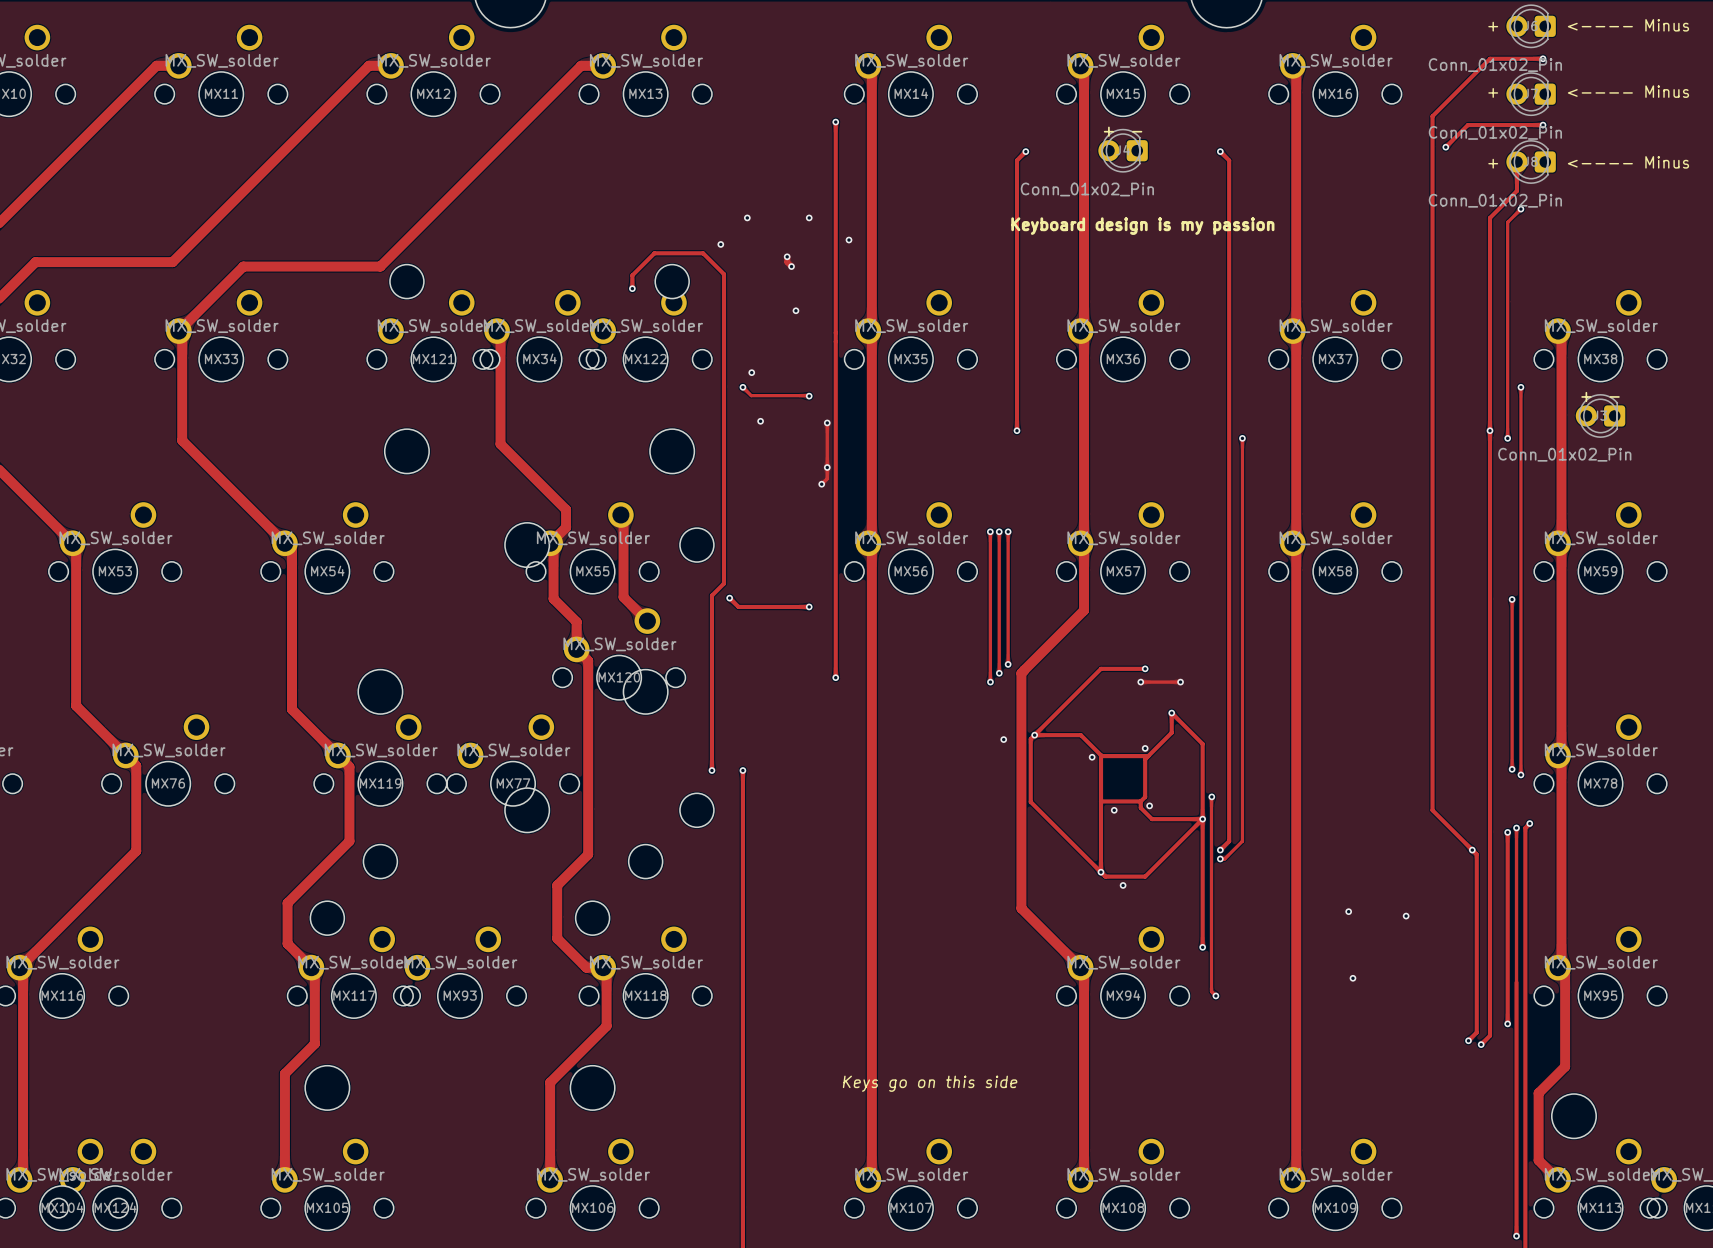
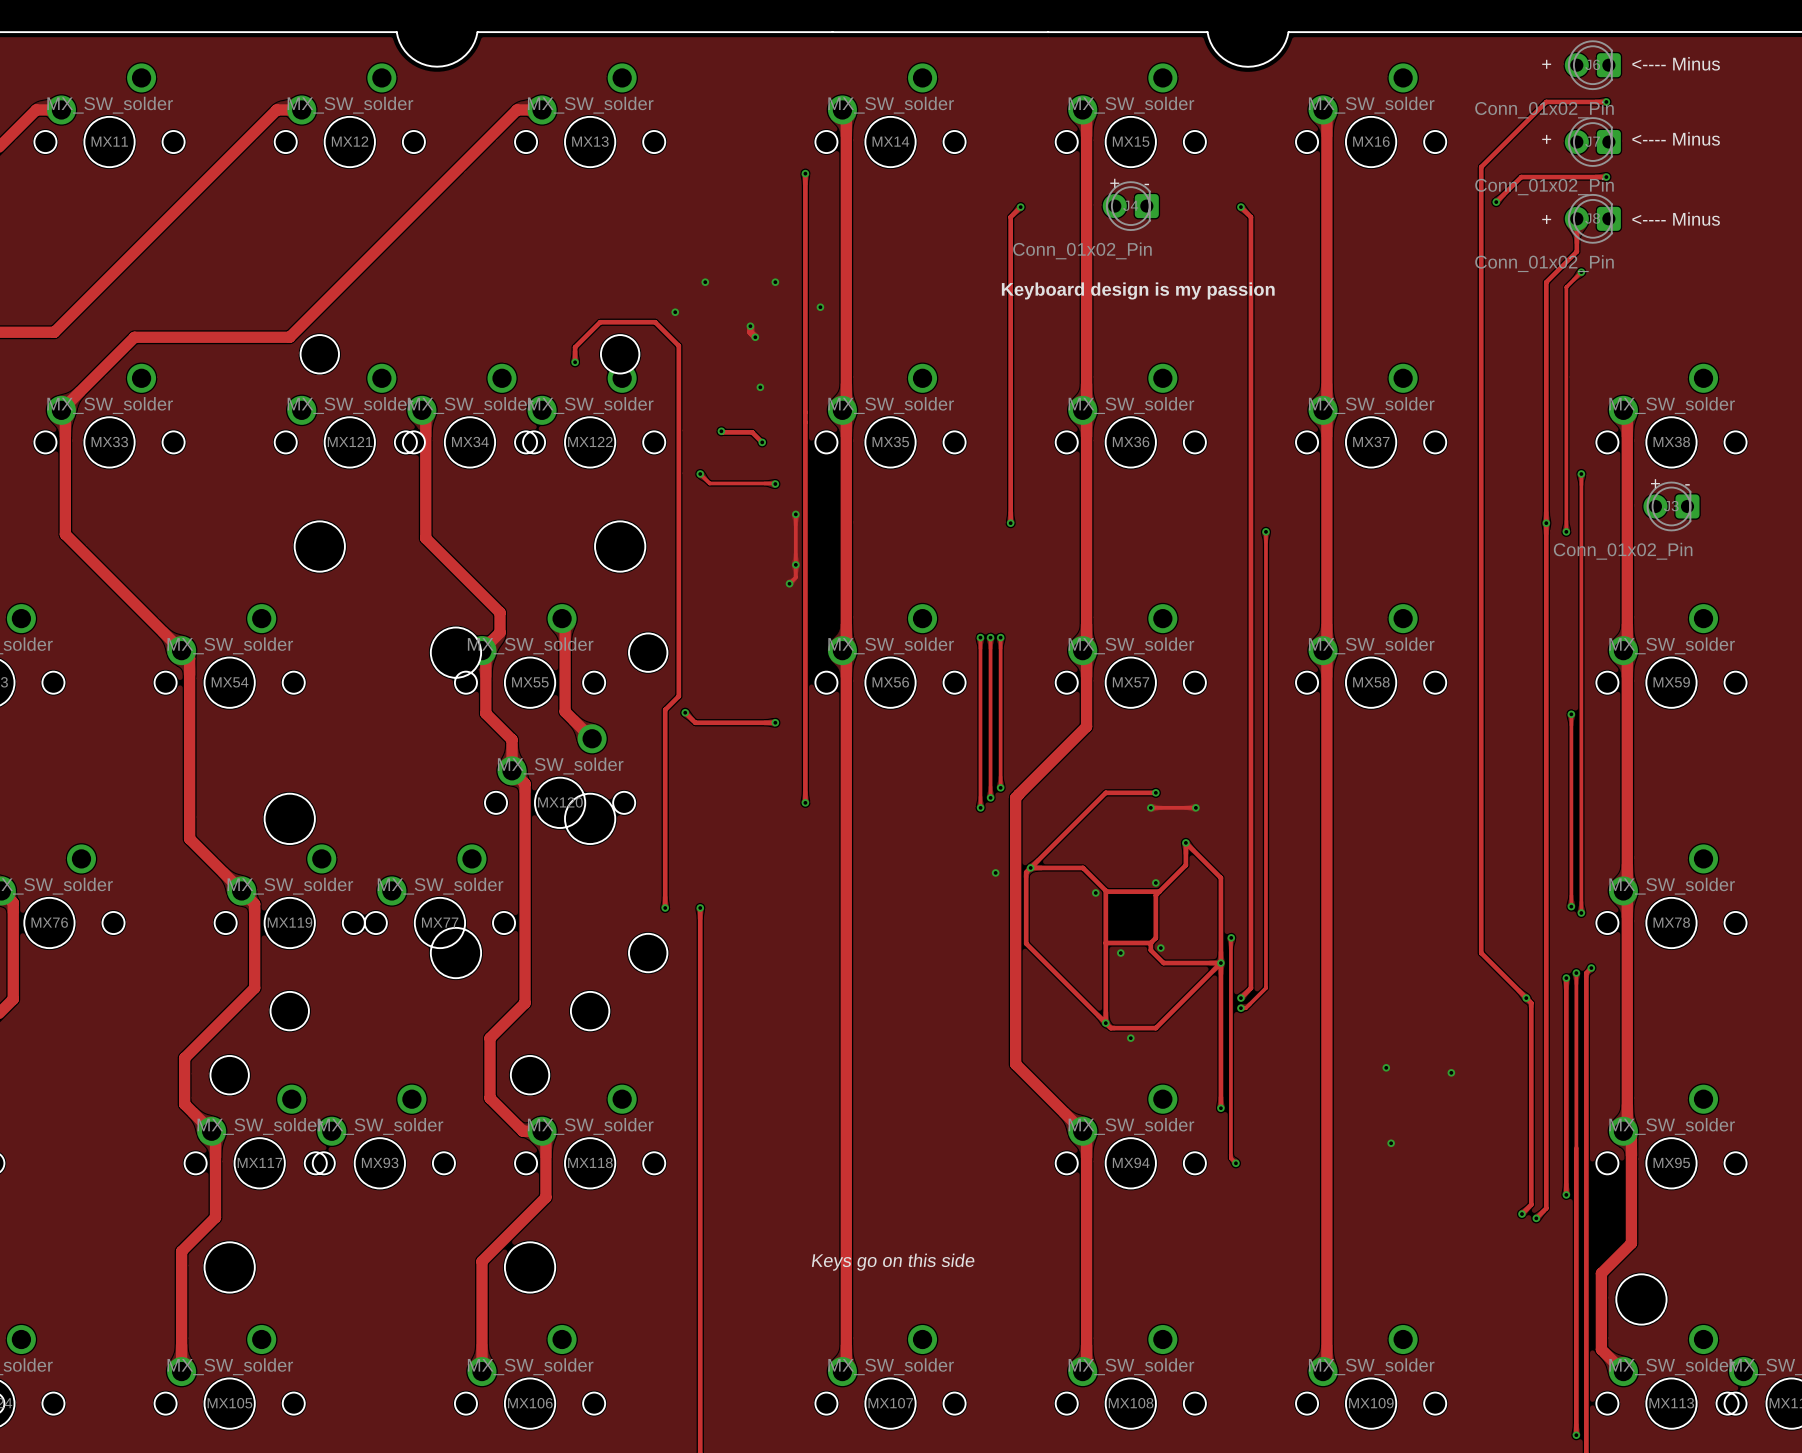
track: none -> (721, 431) (752, 432) (762, 442)
via: none -> (721, 431)
via: none -> (762, 442)
via: (751, 372) -> none
via: (760, 421) -> none

